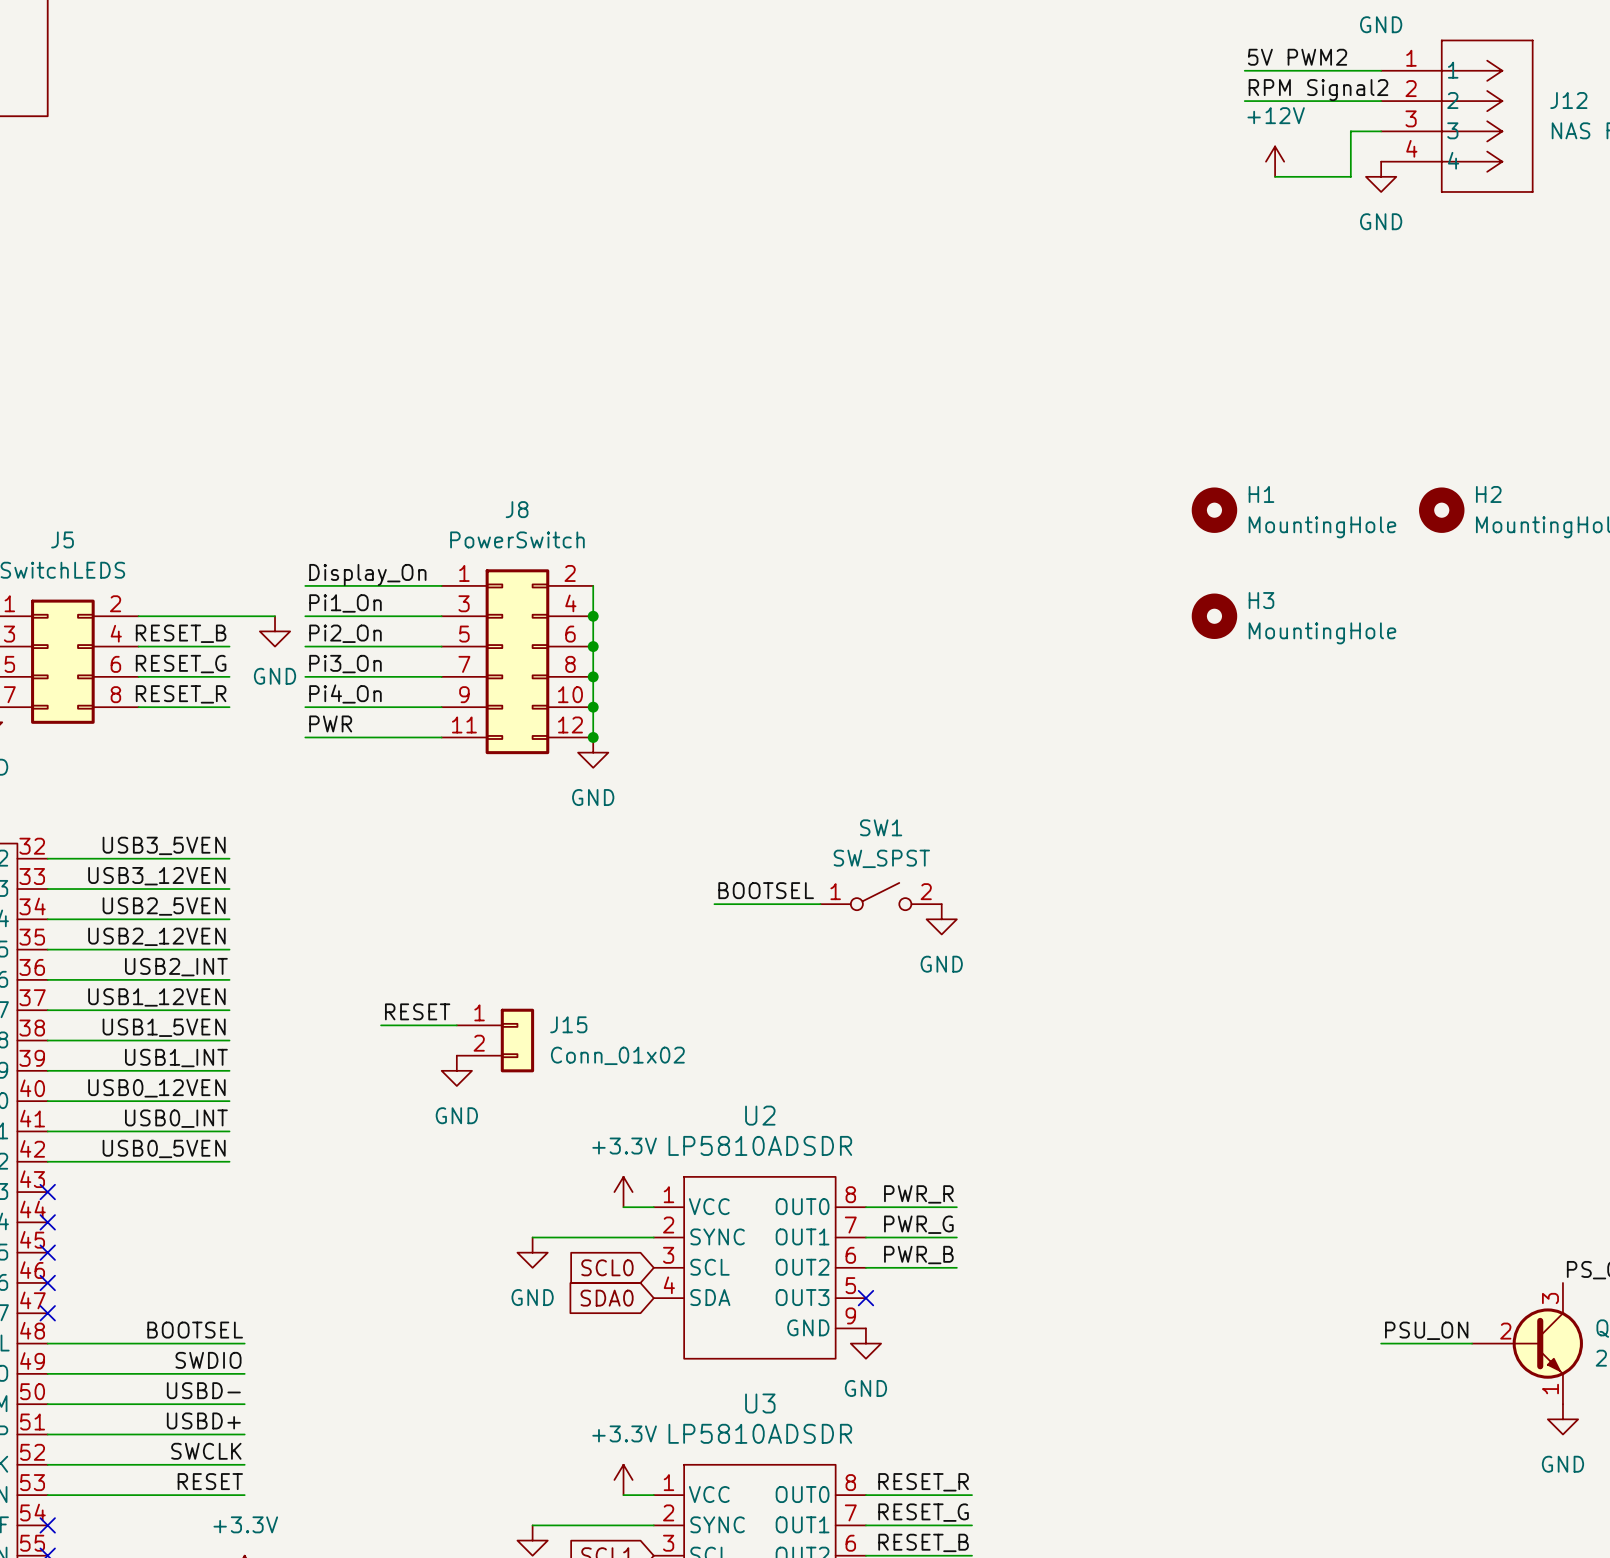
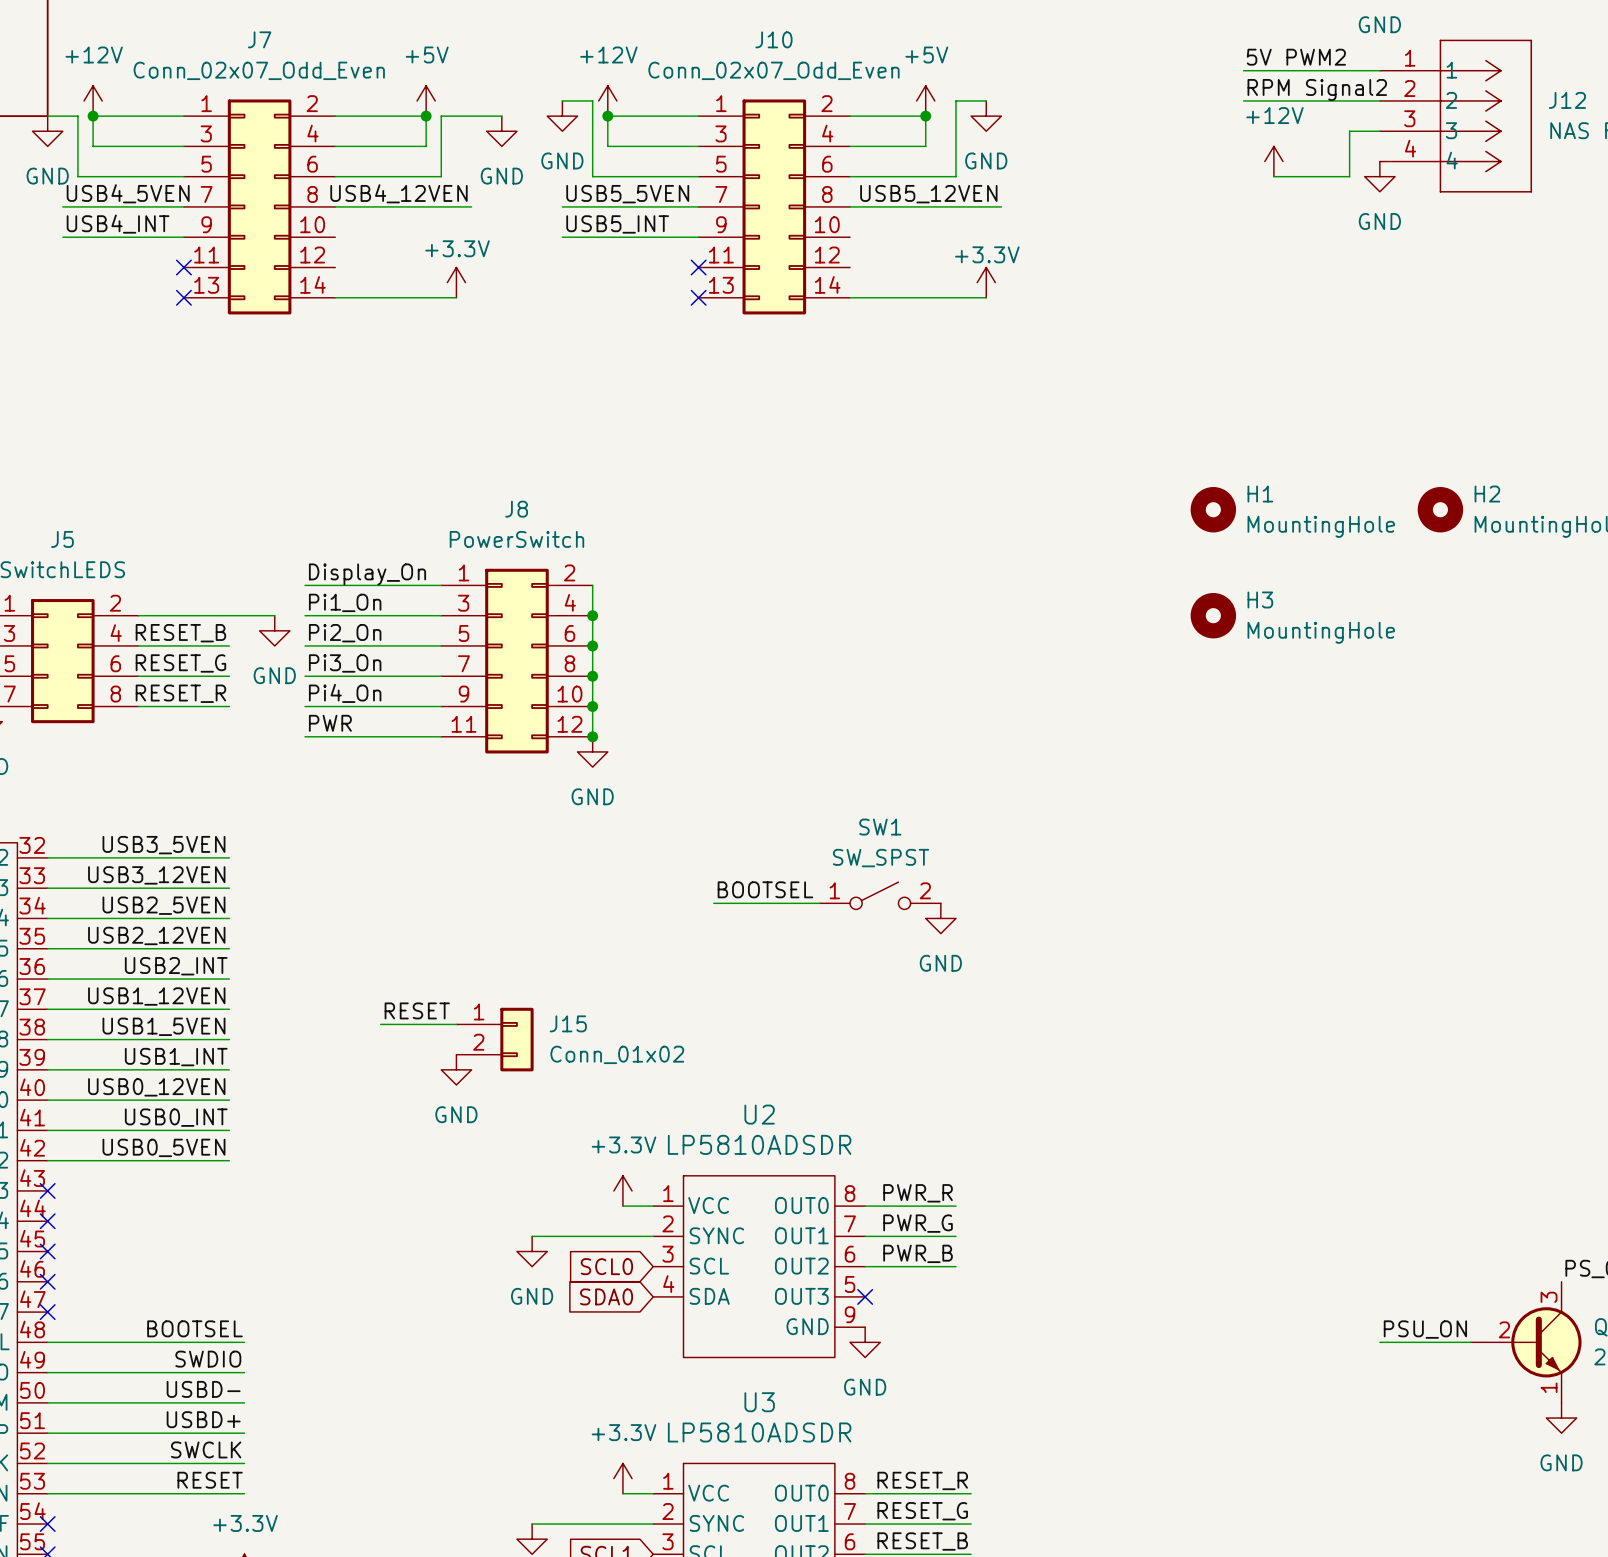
power symbol: none -> +12V (93, 100)
power symbol: none -> +5V (426, 100)
wire: none -> (562, 100) (592, 100) (592, 176) (698, 176)
power symbol: none -> +12V (607, 100)
power symbol: none -> +5V (925, 100)
wire: none -> (986, 100) (955, 100) (955, 176) (850, 176)
wire: none -> (47, 116) (77, 116) (77, 176) (183, 176)
junction: none -> (93, 116)
wire: none -> (183, 116) (93, 116) (93, 146) (183, 146)
wire: none -> (335, 116) (426, 116) (426, 146) (335, 146)
junction: none -> (426, 116)
wire: none -> (501, 116) (441, 116) (441, 176) (335, 176)
power symbol: none -> GND (562, 116)
junction: none -> (607, 116)
wire: none -> (698, 116) (607, 116) (607, 146) (698, 146)
wire: none -> (850, 116) (925, 116) (925, 146) (850, 146)
junction: none -> (925, 116)
power symbol: none -> GND (986, 116)
power symbol: none -> GND (47, 131)
power symbol: none -> GND (501, 131)
label: none -> USB4_5VEN (128, 193)
label: none -> USB4_12VEN (398, 193)
label: none -> USB5_5VEN (627, 194)
label: none -> USB5_12VEN (928, 194)
wire: none -> (62, 206) (183, 206)
J7: none -> Conn_02x07_Odd_Even (259, 206)
wire: none -> (335, 206) (471, 206)
wire: none -> (562, 206) (698, 206)
J10: none -> Conn_02x07_Odd_Even (774, 206)
wire: none -> (850, 206) (1001, 206)
label: none -> USB4_INT (118, 224)
label: none -> USB5_INT (617, 224)
wire: none -> (62, 237) (183, 237)
wire: none -> (562, 237) (698, 237)
no-connect mark: none -> (183, 267)
no-connect mark: none -> (698, 267)
power symbol: none -> +3.3V (456, 282)
power symbol: none -> +3.3V (986, 282)
no-connect mark: none -> (183, 297)
wire: none -> (335, 297) (456, 297)
no-connect mark: none -> (698, 297)
wire: none -> (850, 297) (986, 297)

